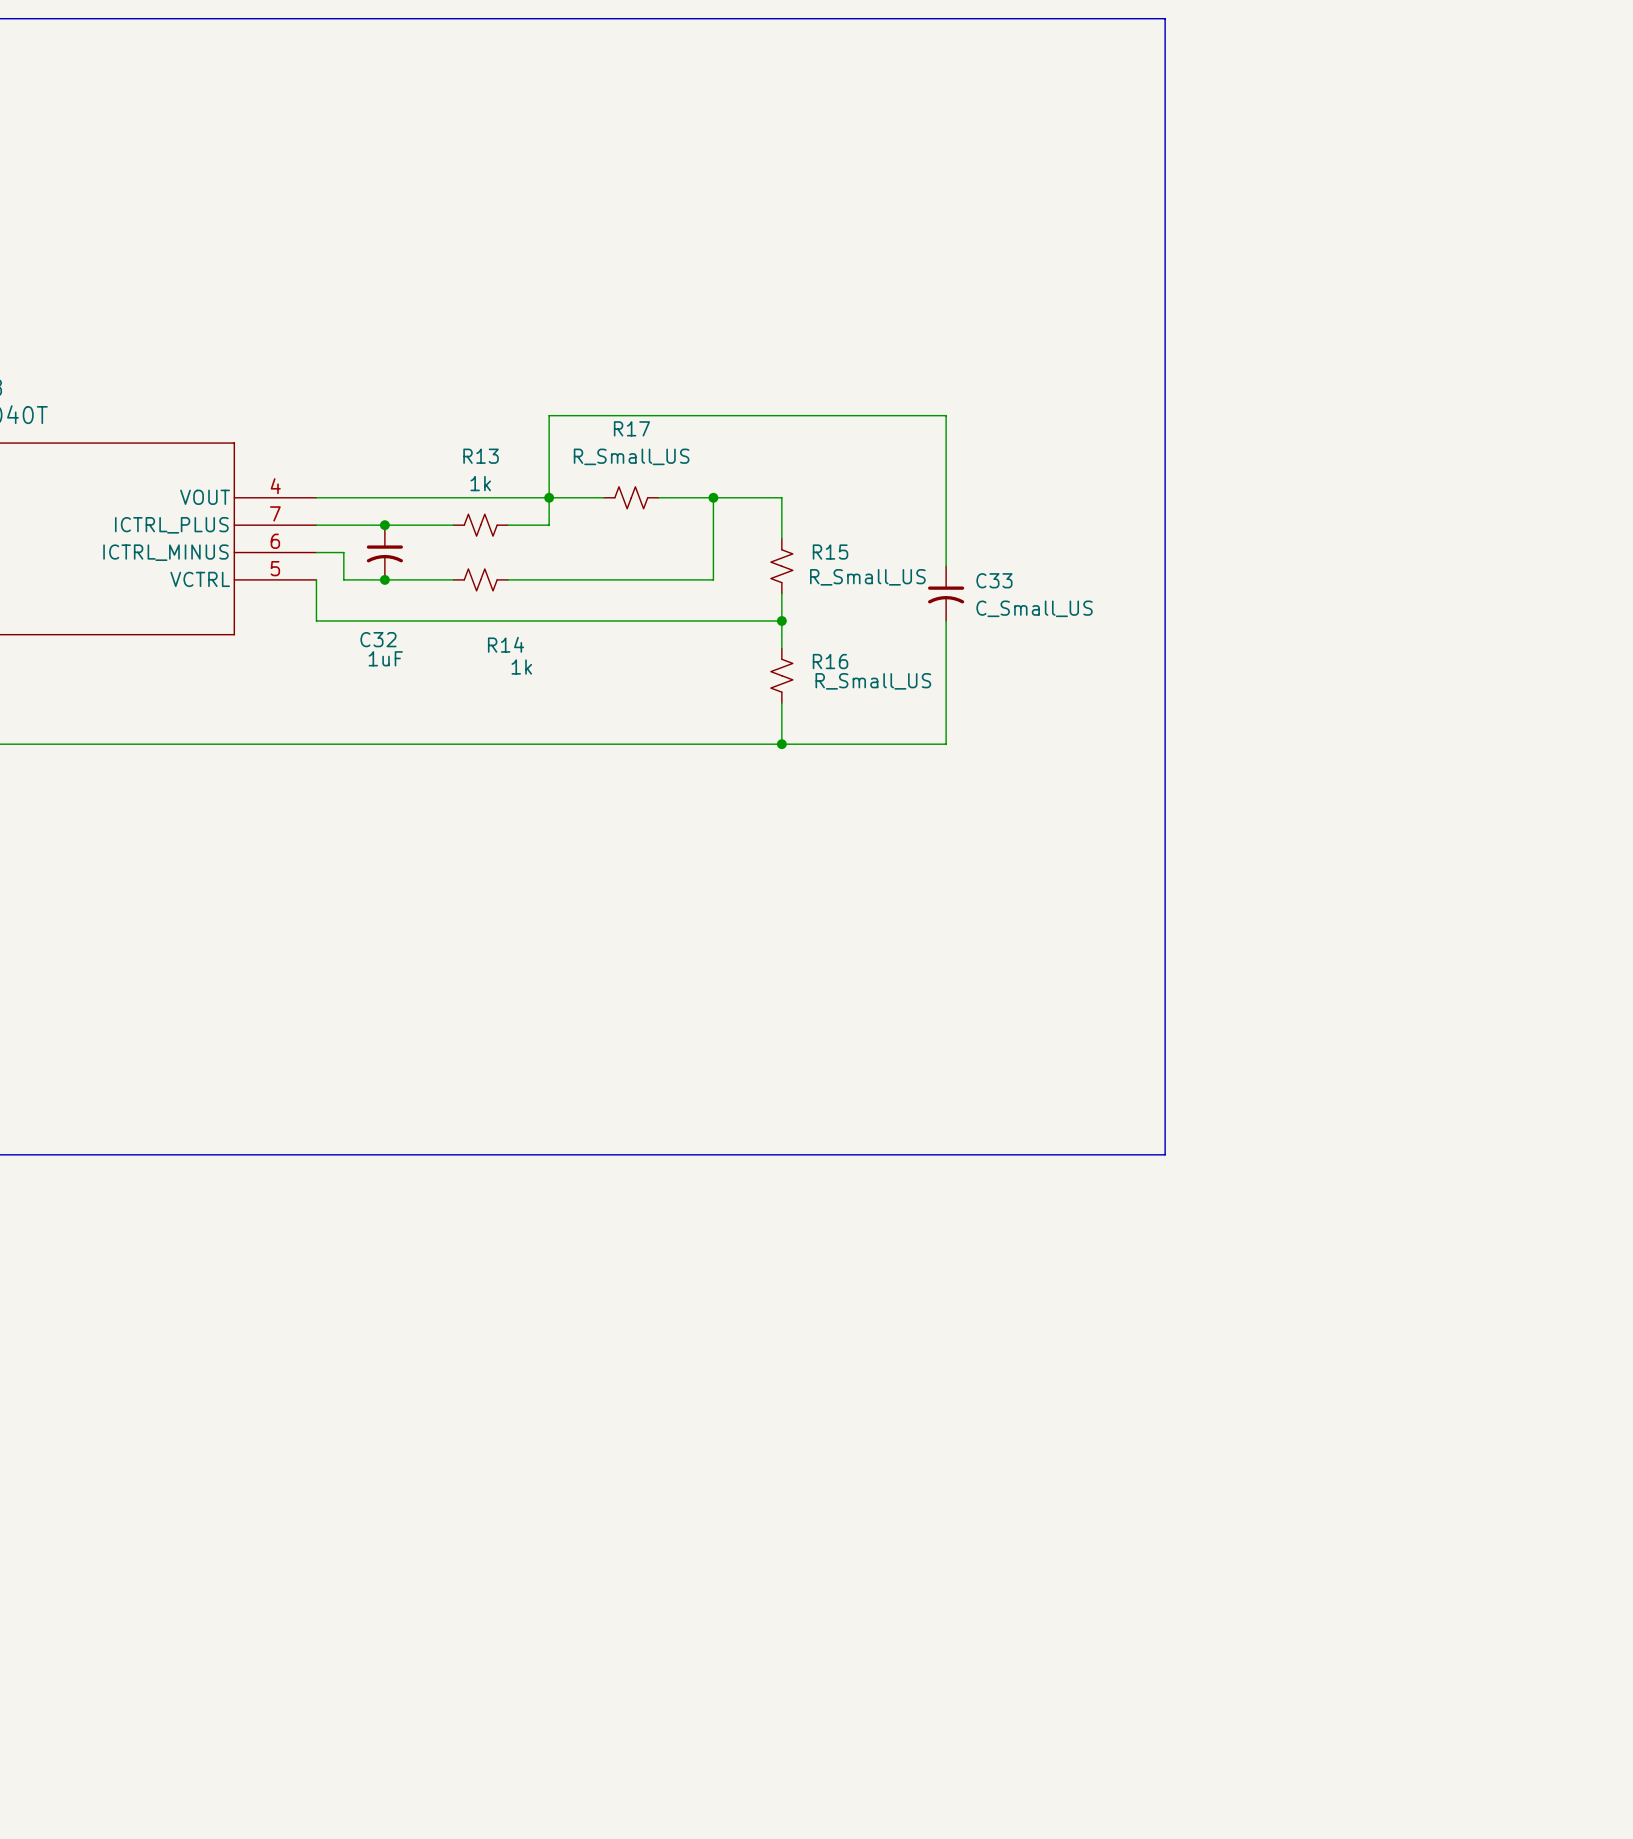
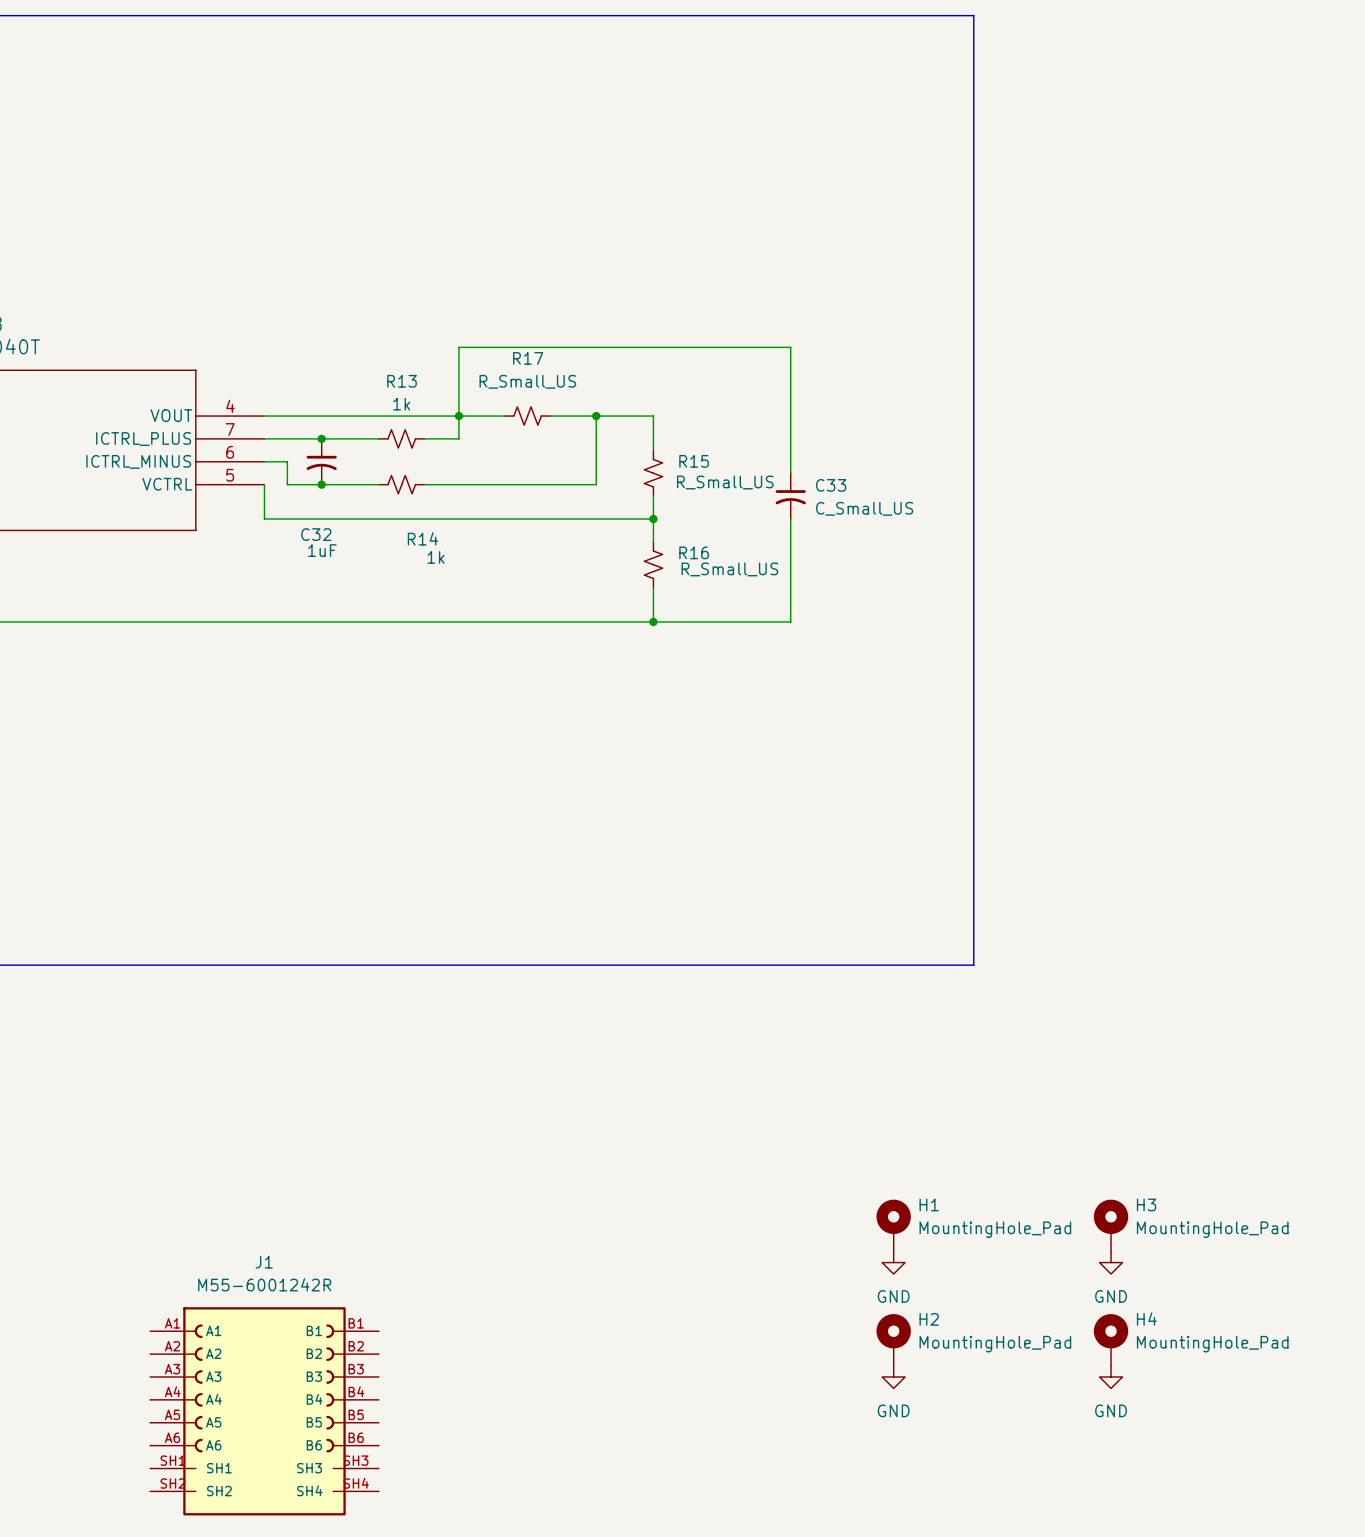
H1: none -> MountingHole_Pad (893, 1225)
H3: none -> MountingHole_Pad (1111, 1225)
power symbol: none -> GND (893, 1262)
power symbol: none -> GND (1111, 1262)
H2: none -> MountingHole_Pad (893, 1339)
H4: none -> MountingHole_Pad (1111, 1339)
power symbol: none -> GND (893, 1376)
power symbol: none -> GND (1111, 1376)
J1: none -> M55-6001242R (264, 1411)

